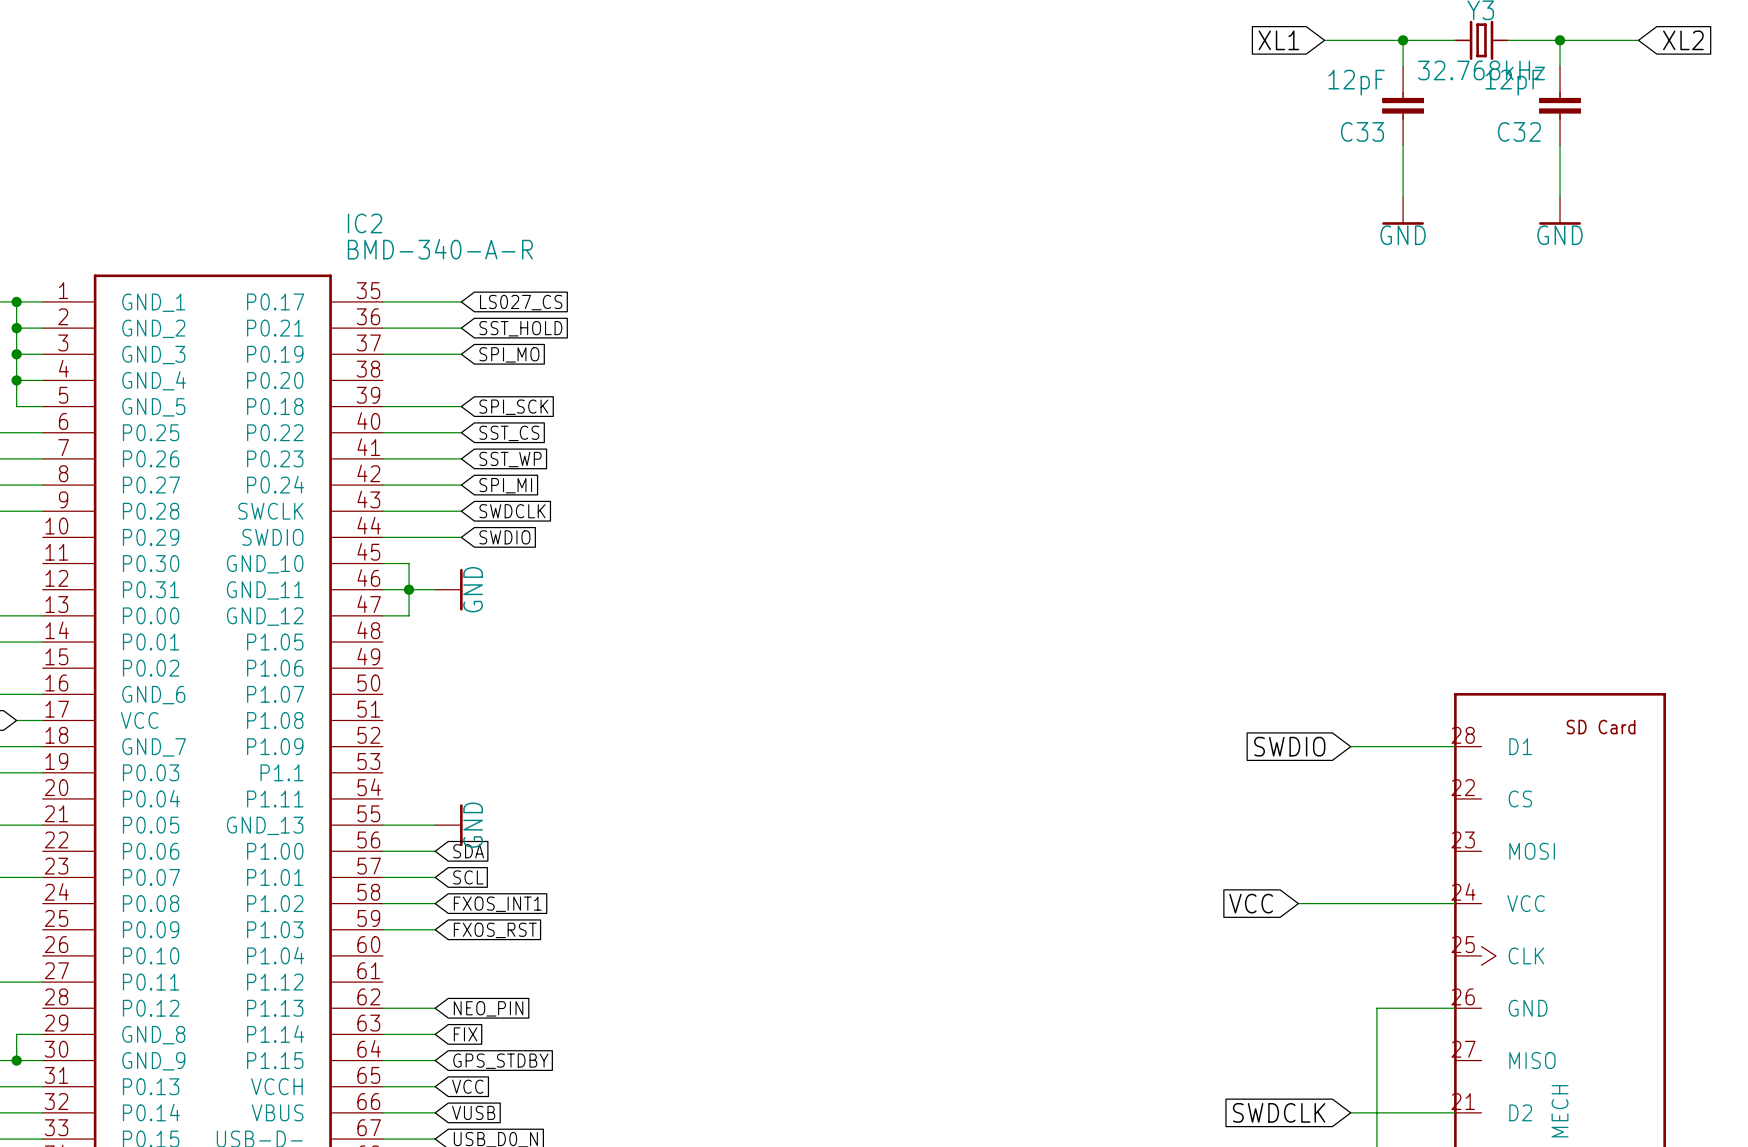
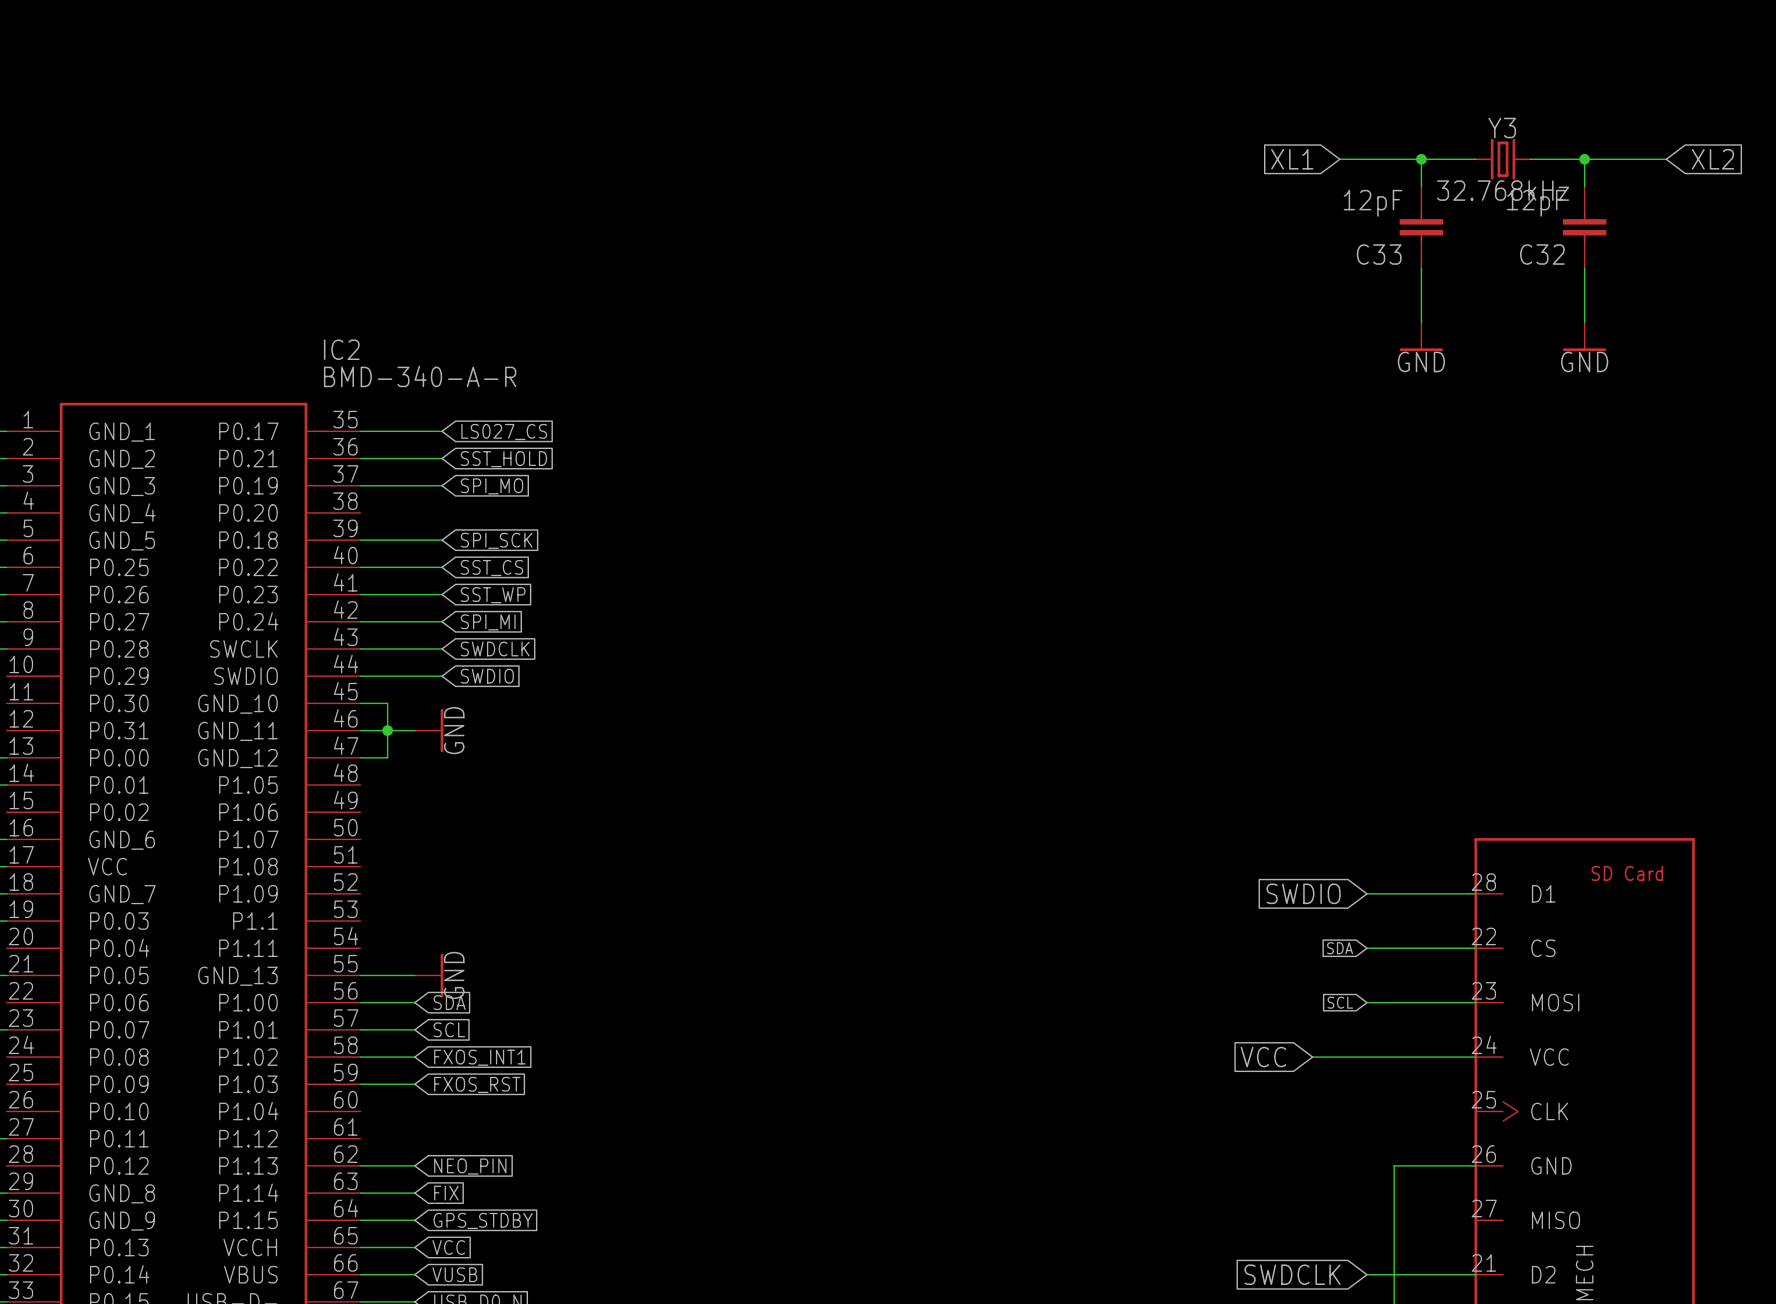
global label: none -> SDA (1340, 948)
wire: none -> (1366, 948) (1475, 948)
global label: none -> SCL (1340, 1002)
wire: none -> (1366, 1002) (1475, 1002)

